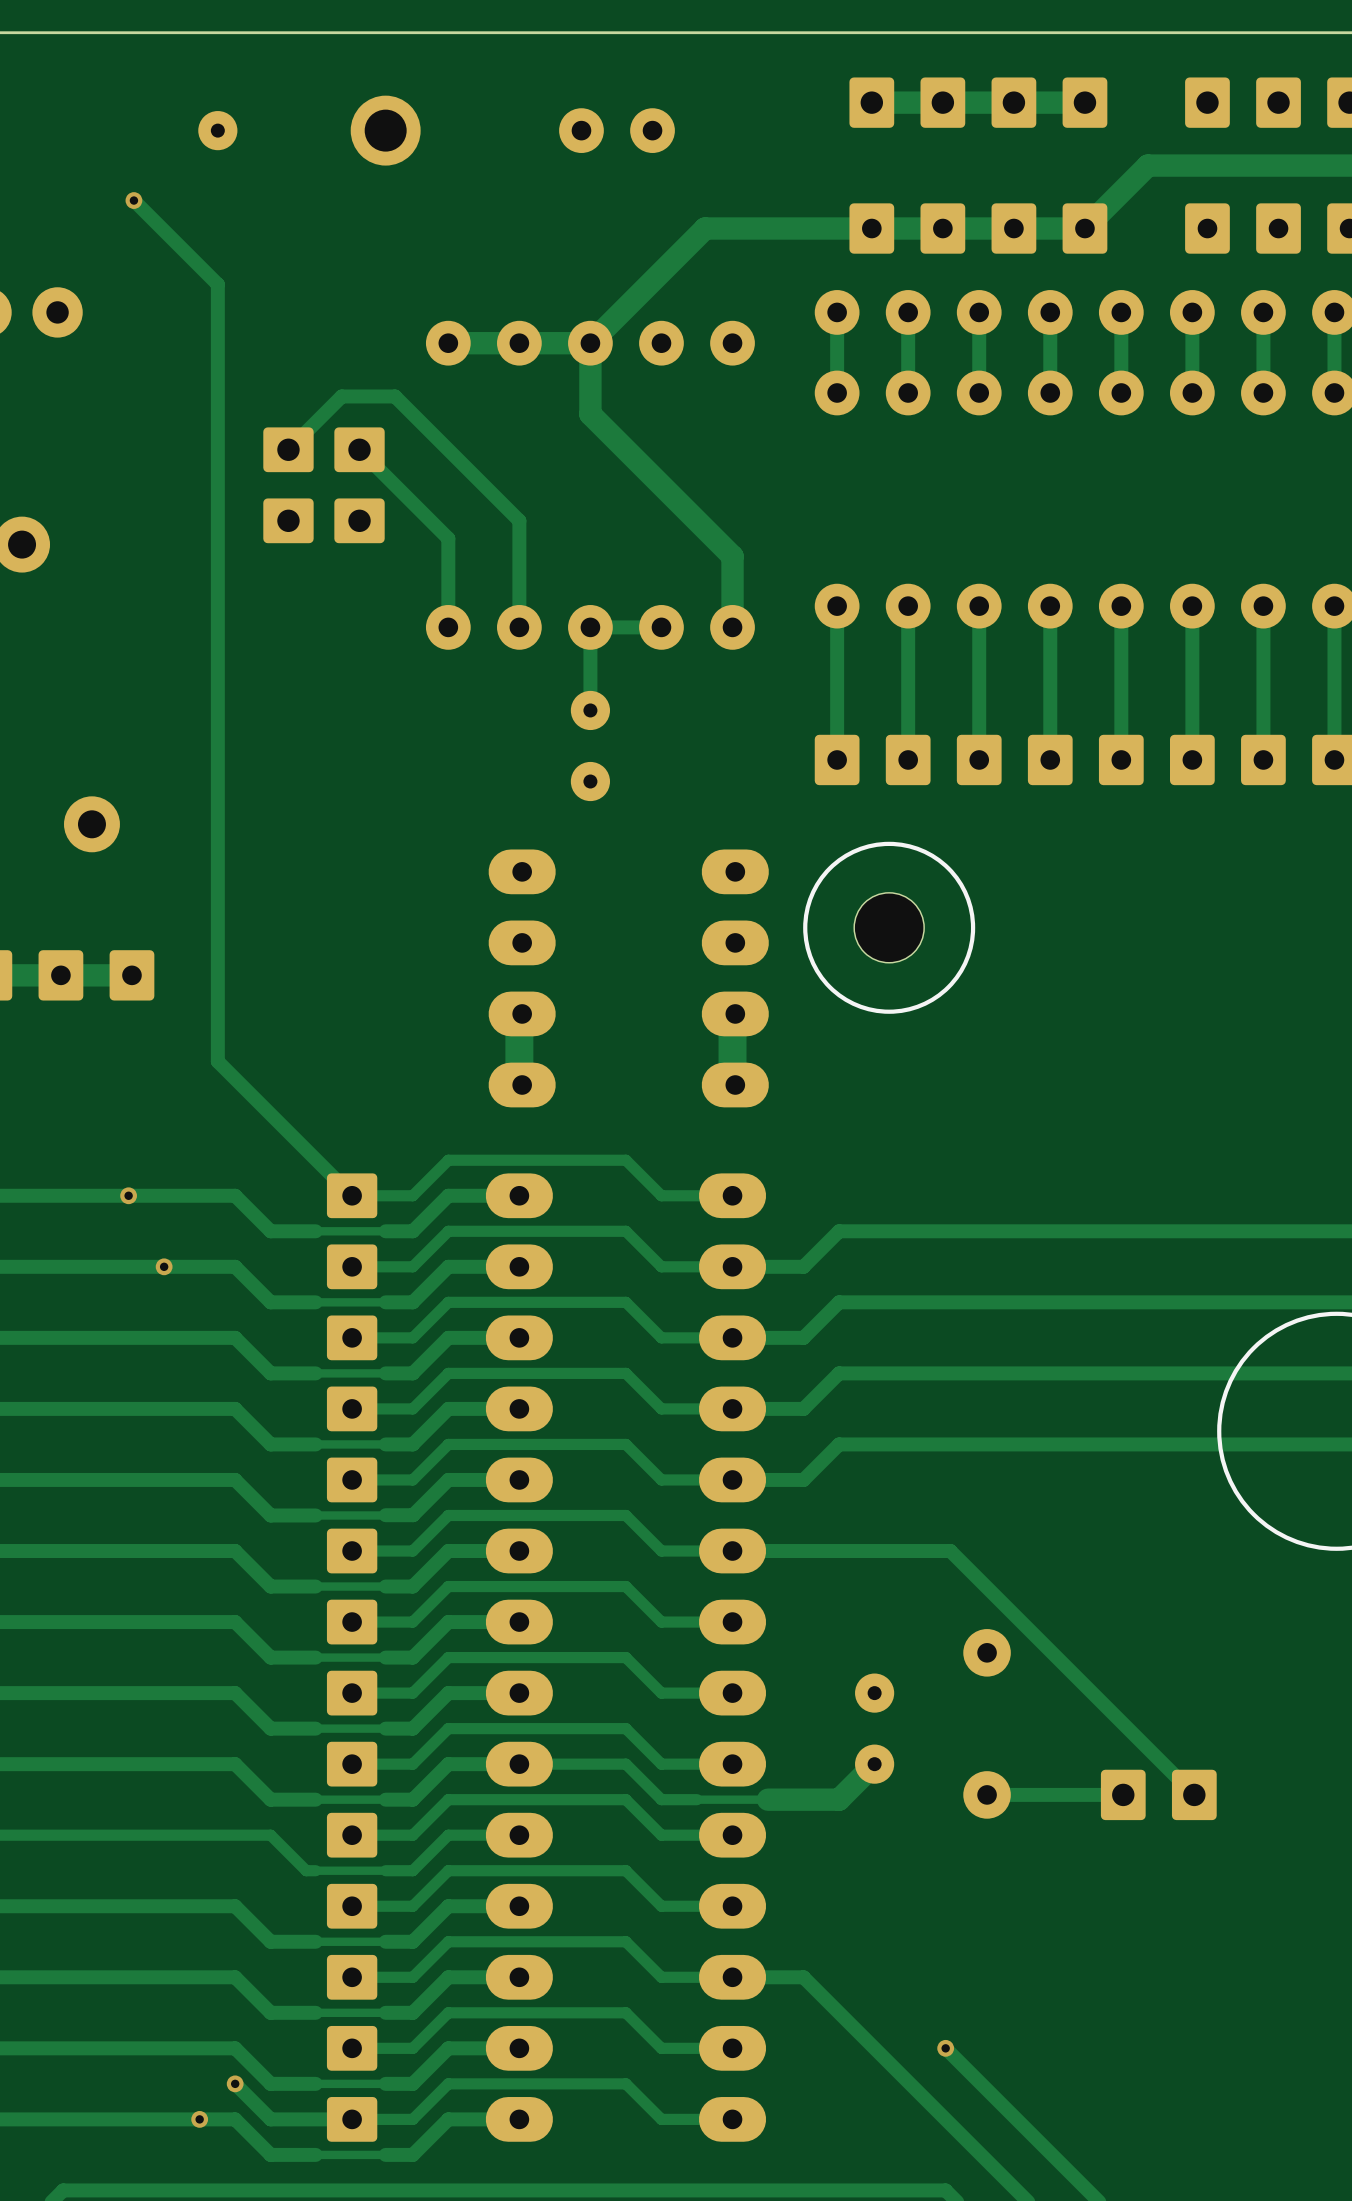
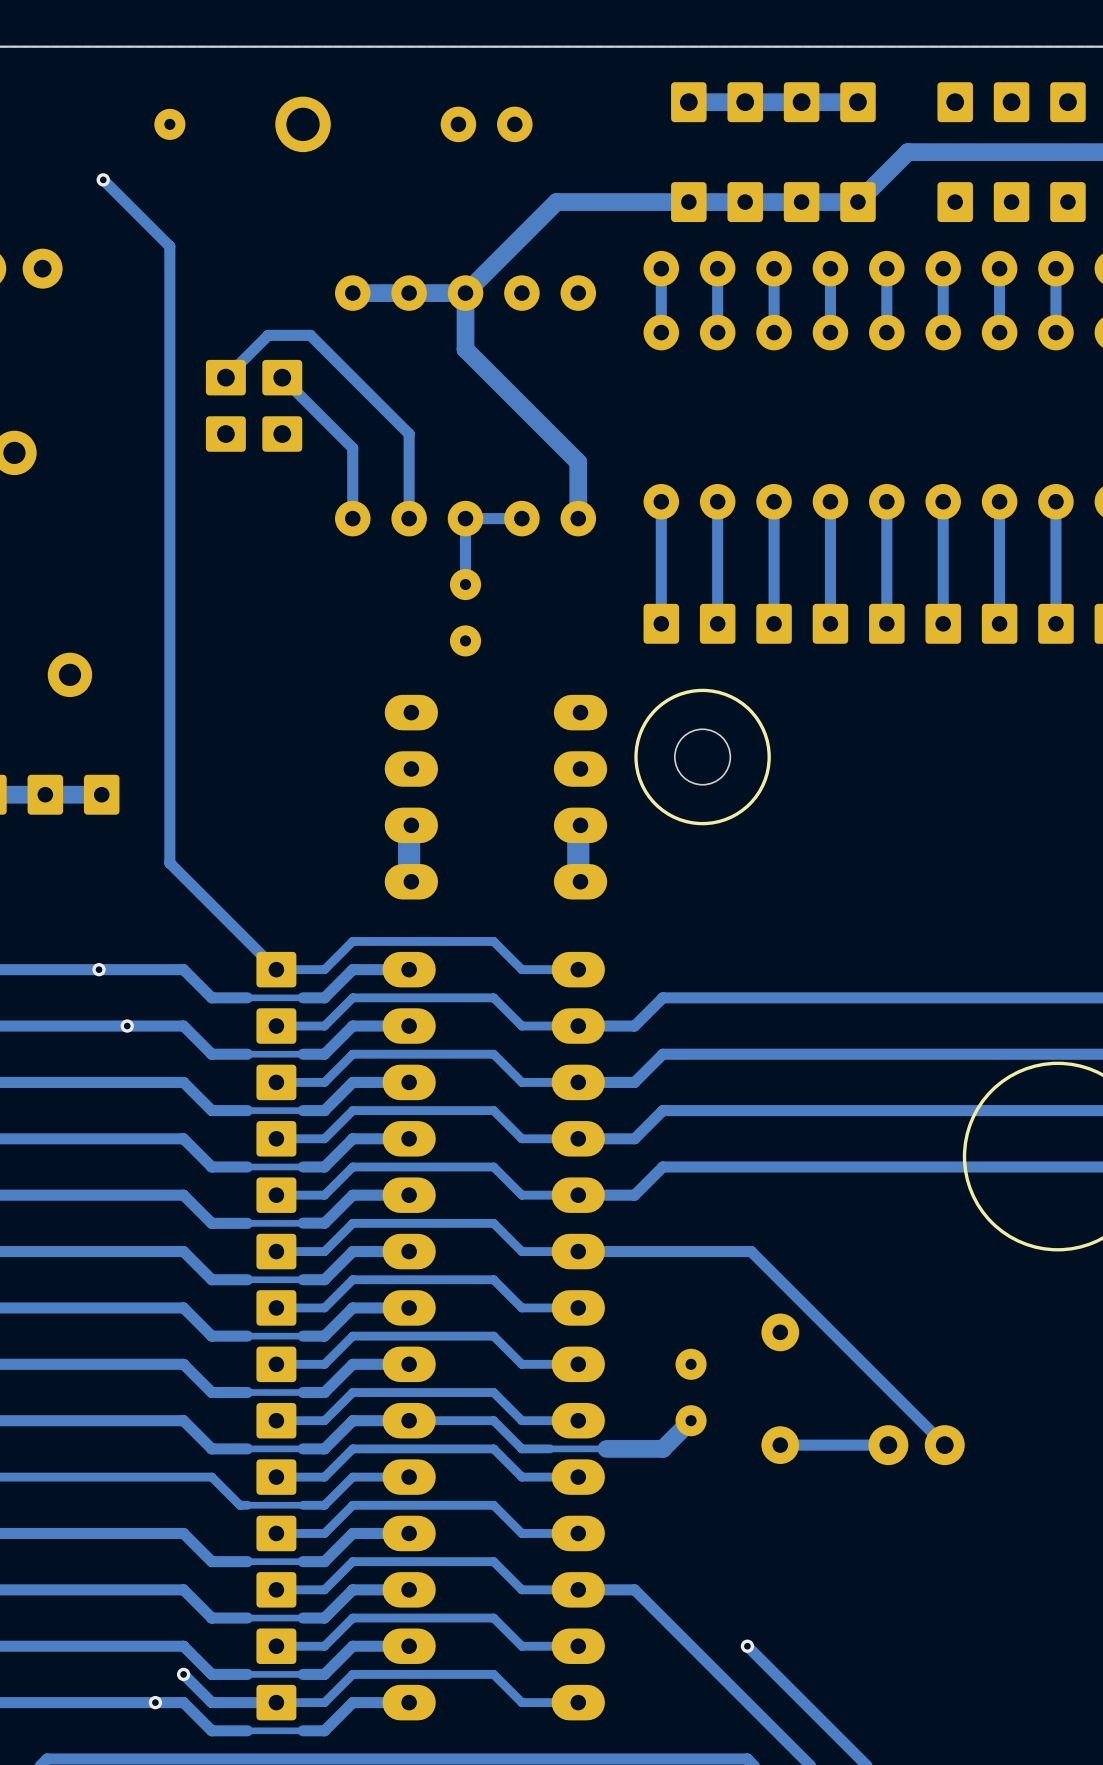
part footprint: [1100, 1769, 1217, 1821] -> [868, 1425, 965, 1466]

